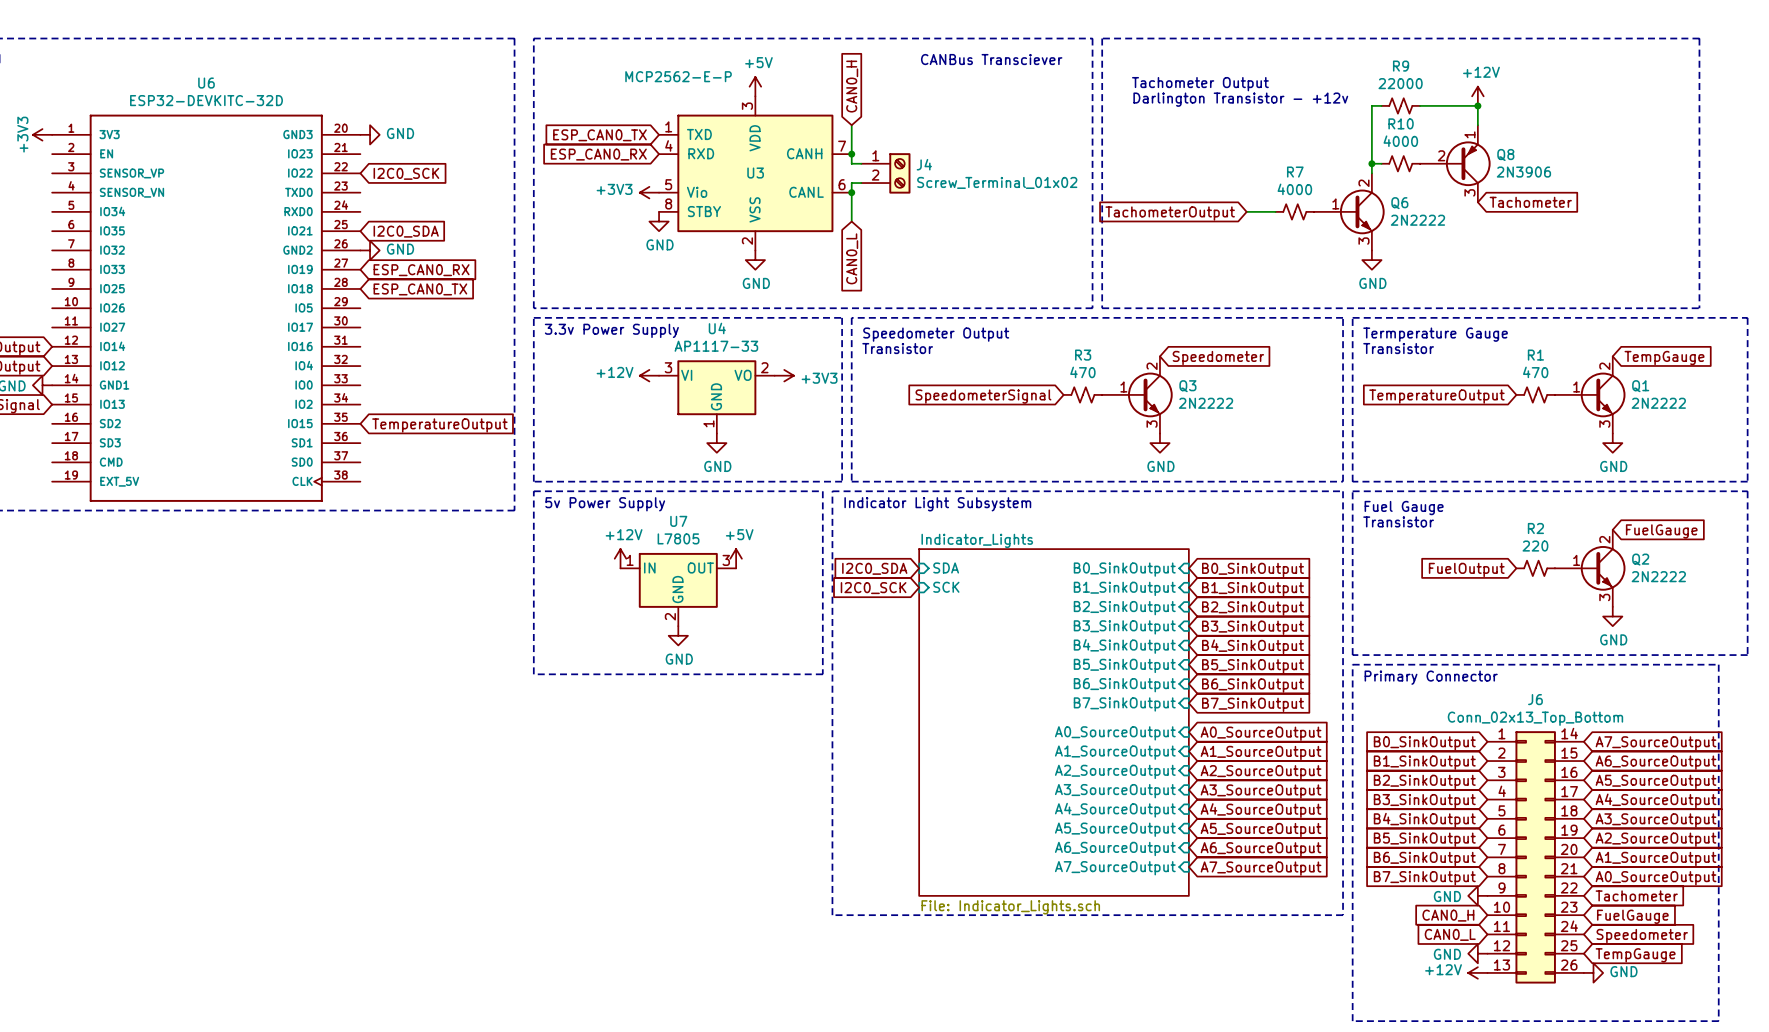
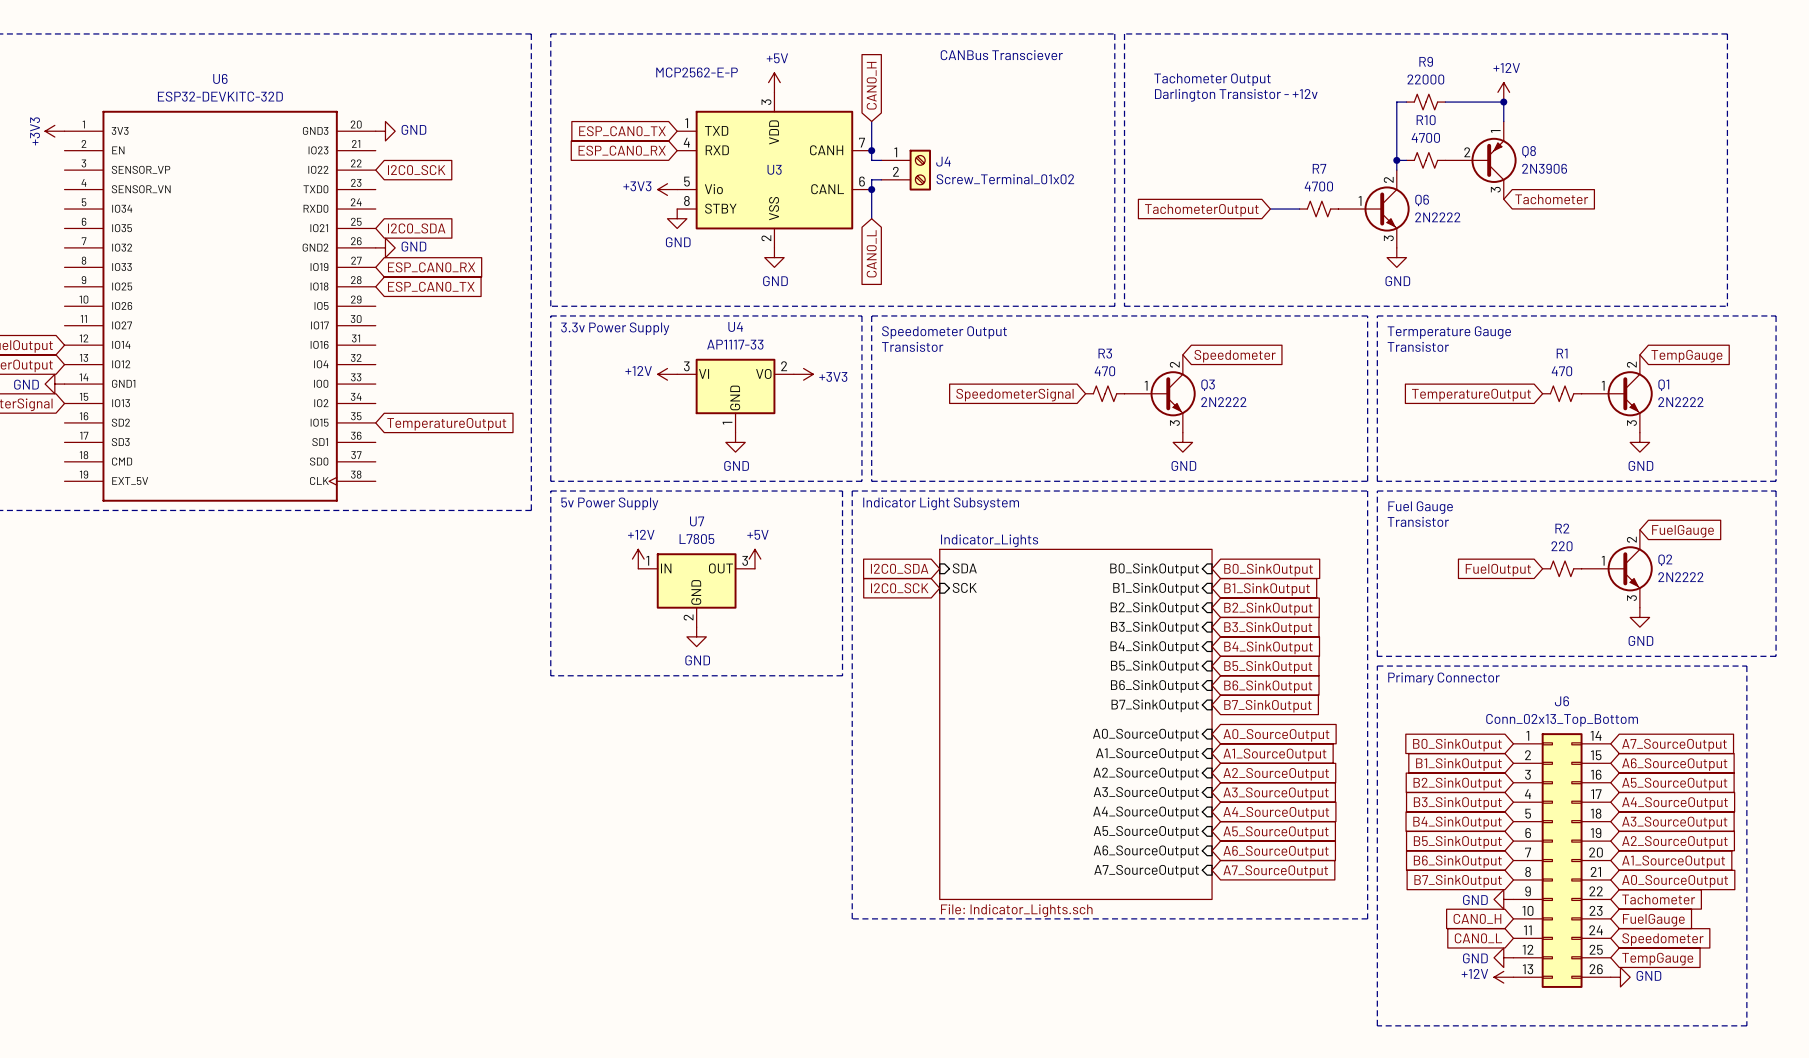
R10 value: 4000 (1400, 141) -> 4700 (1425, 137)
R7 value: 4000 (1294, 189) -> 4700 (1318, 186)

